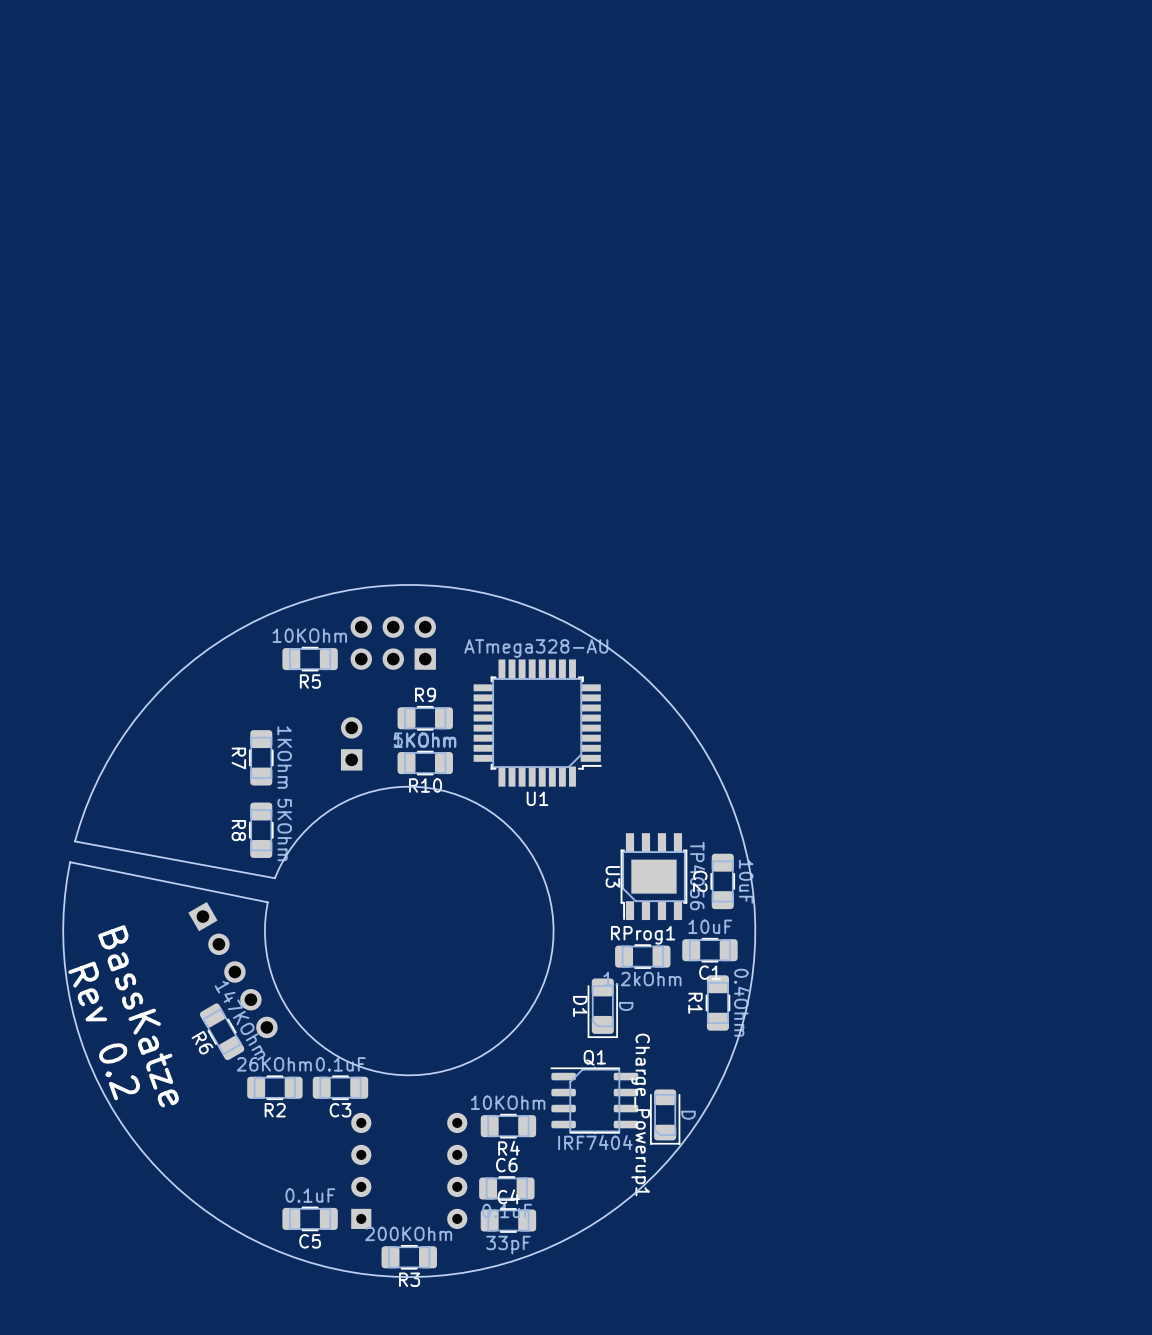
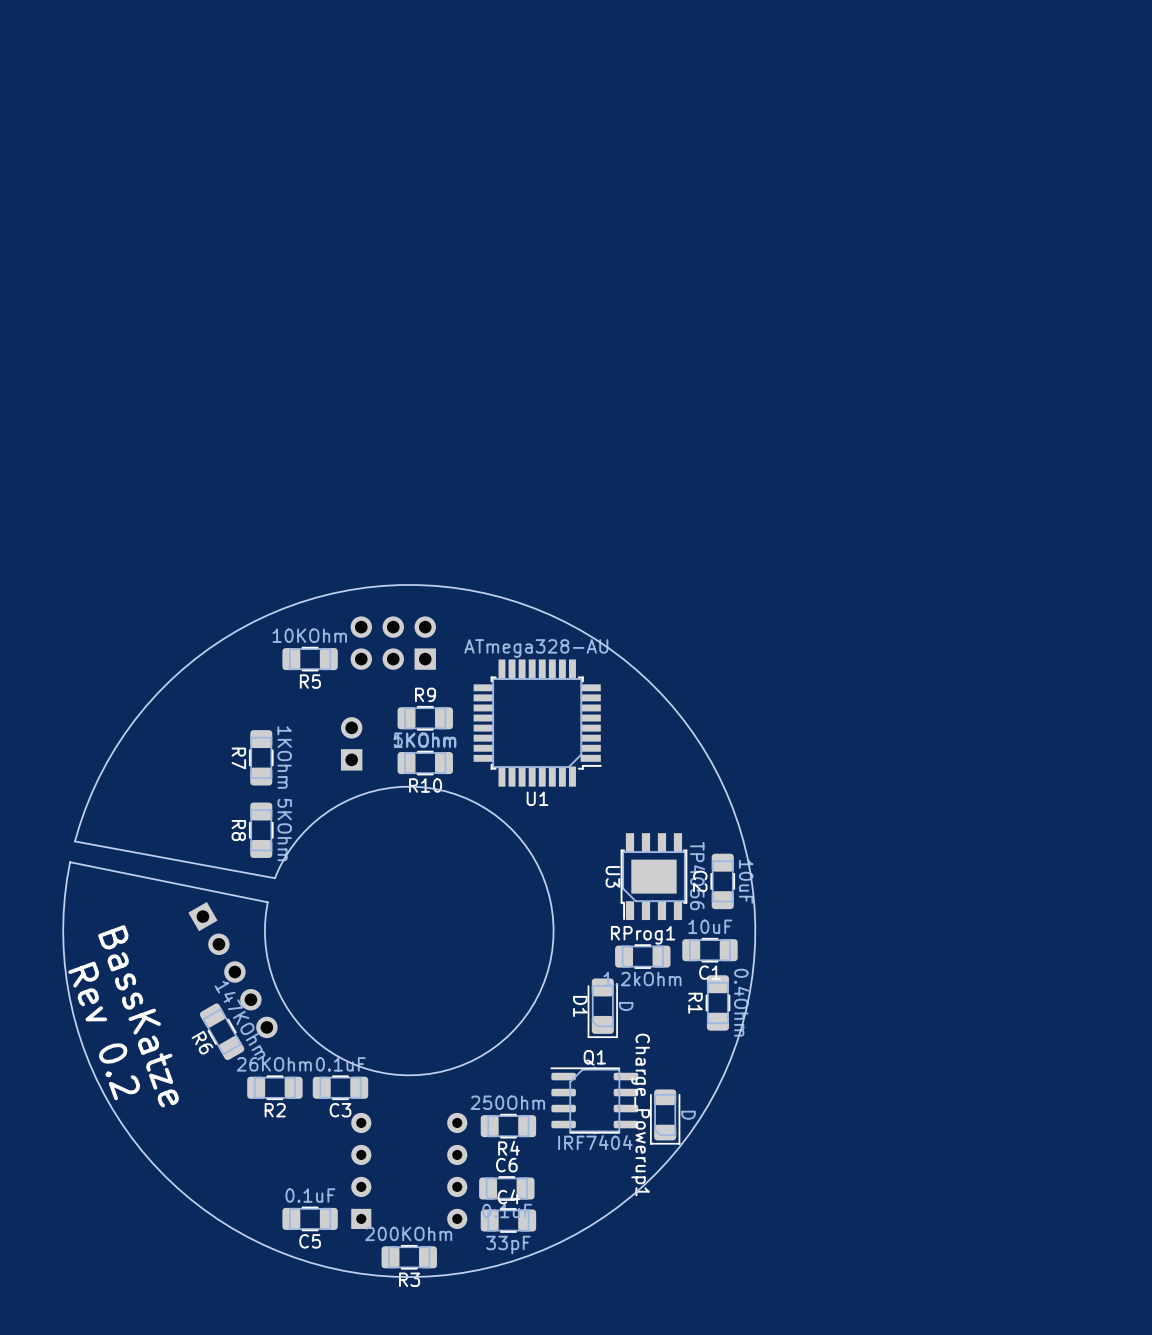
R4 value: 10KOhm (508, 1102) -> 250Ohm (507, 1102)

